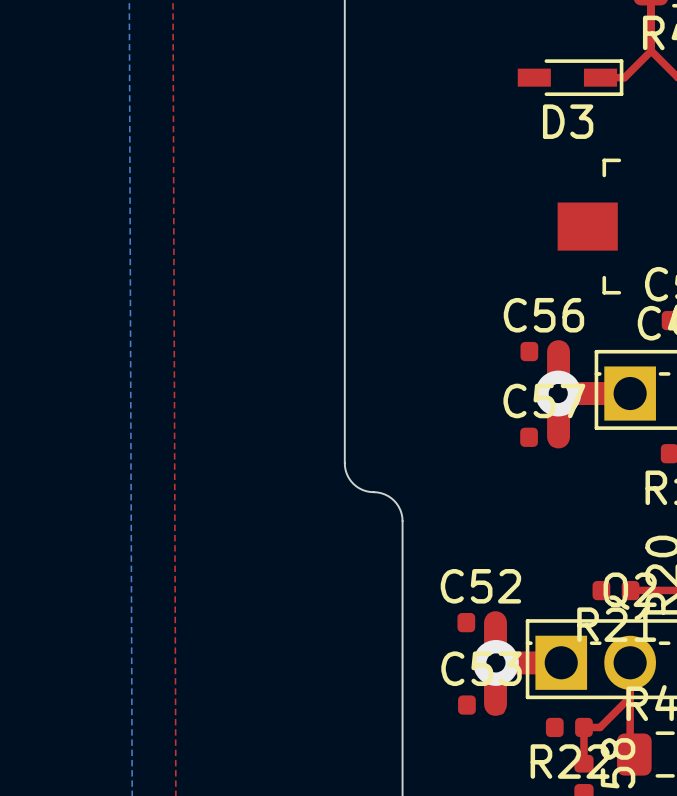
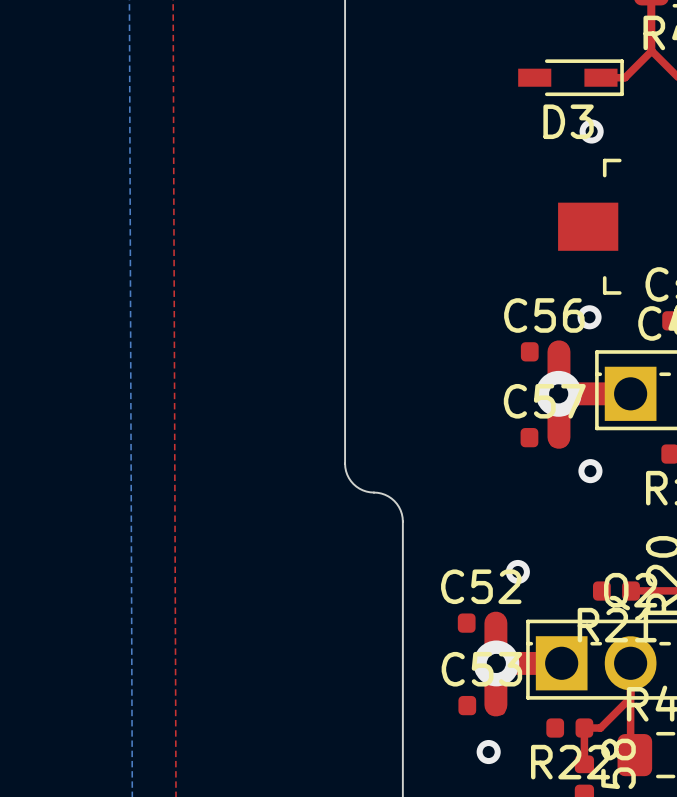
via: none -> (591, 131)
via: none -> (589, 317)
via: none -> (590, 471)
via: none -> (517, 571)
via: none -> (488, 752)

